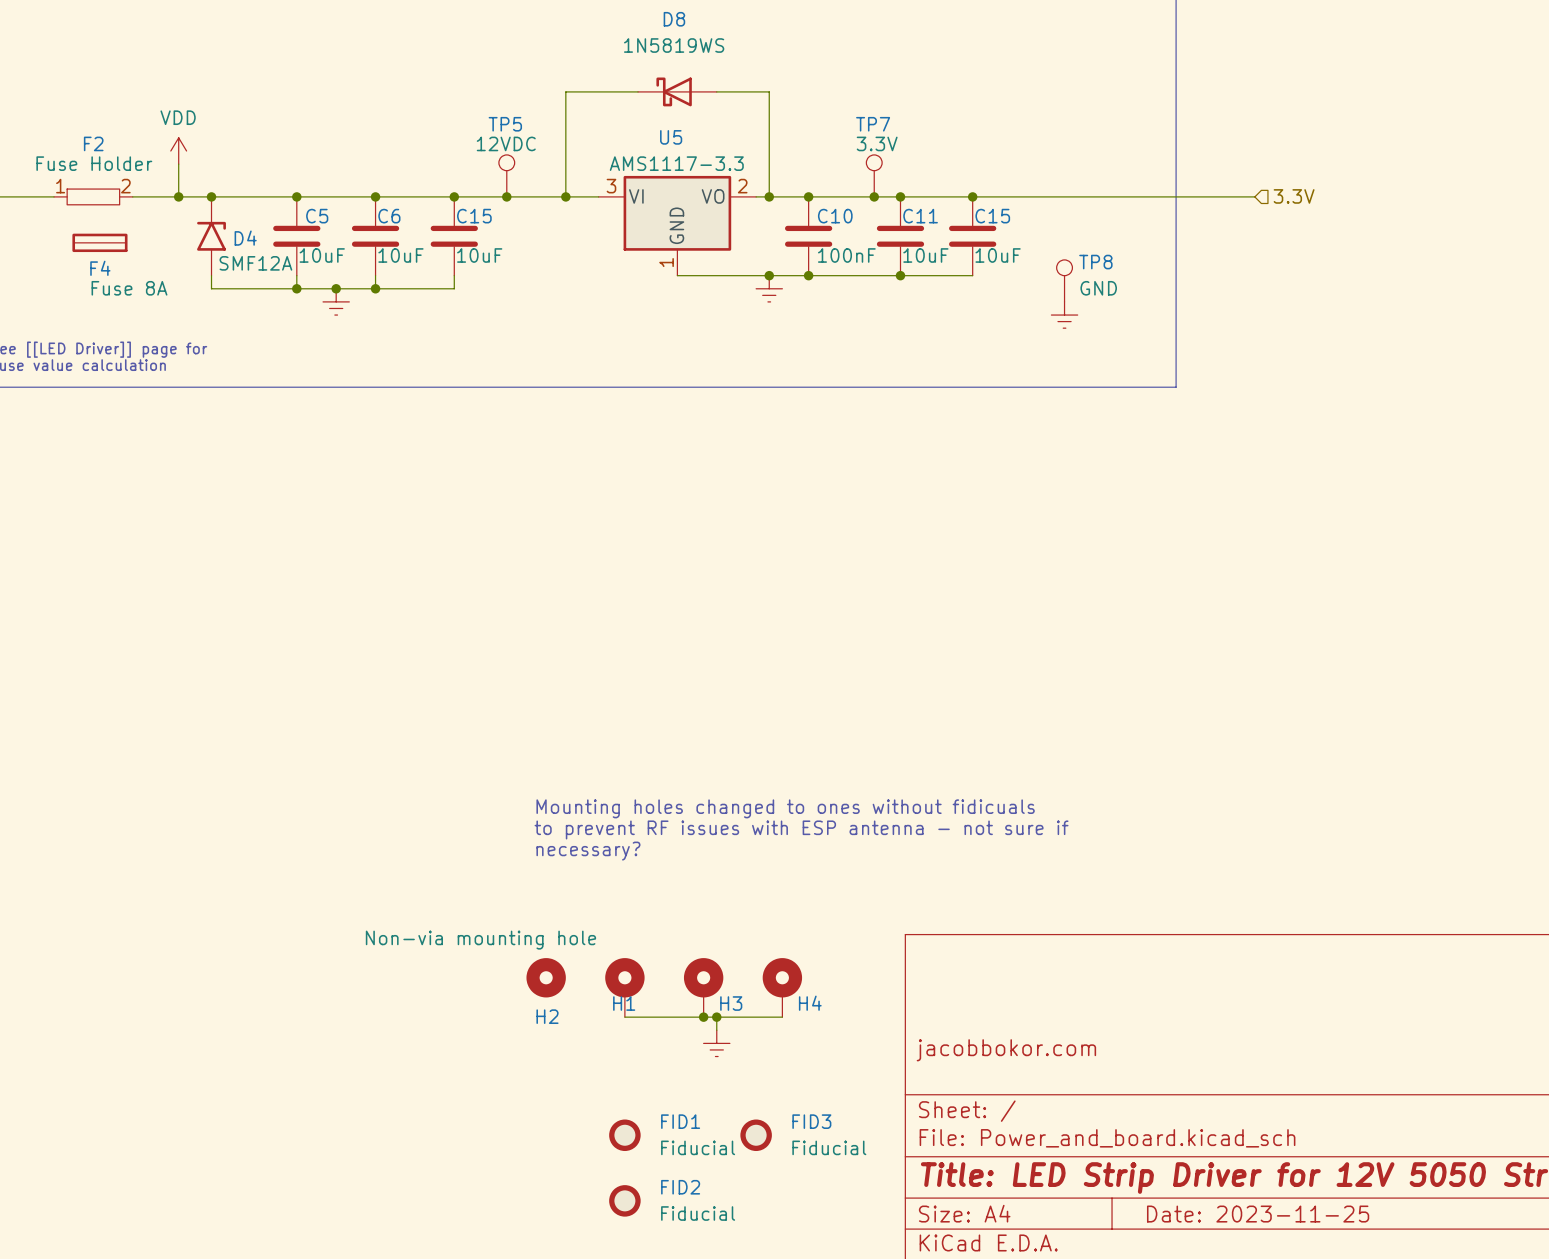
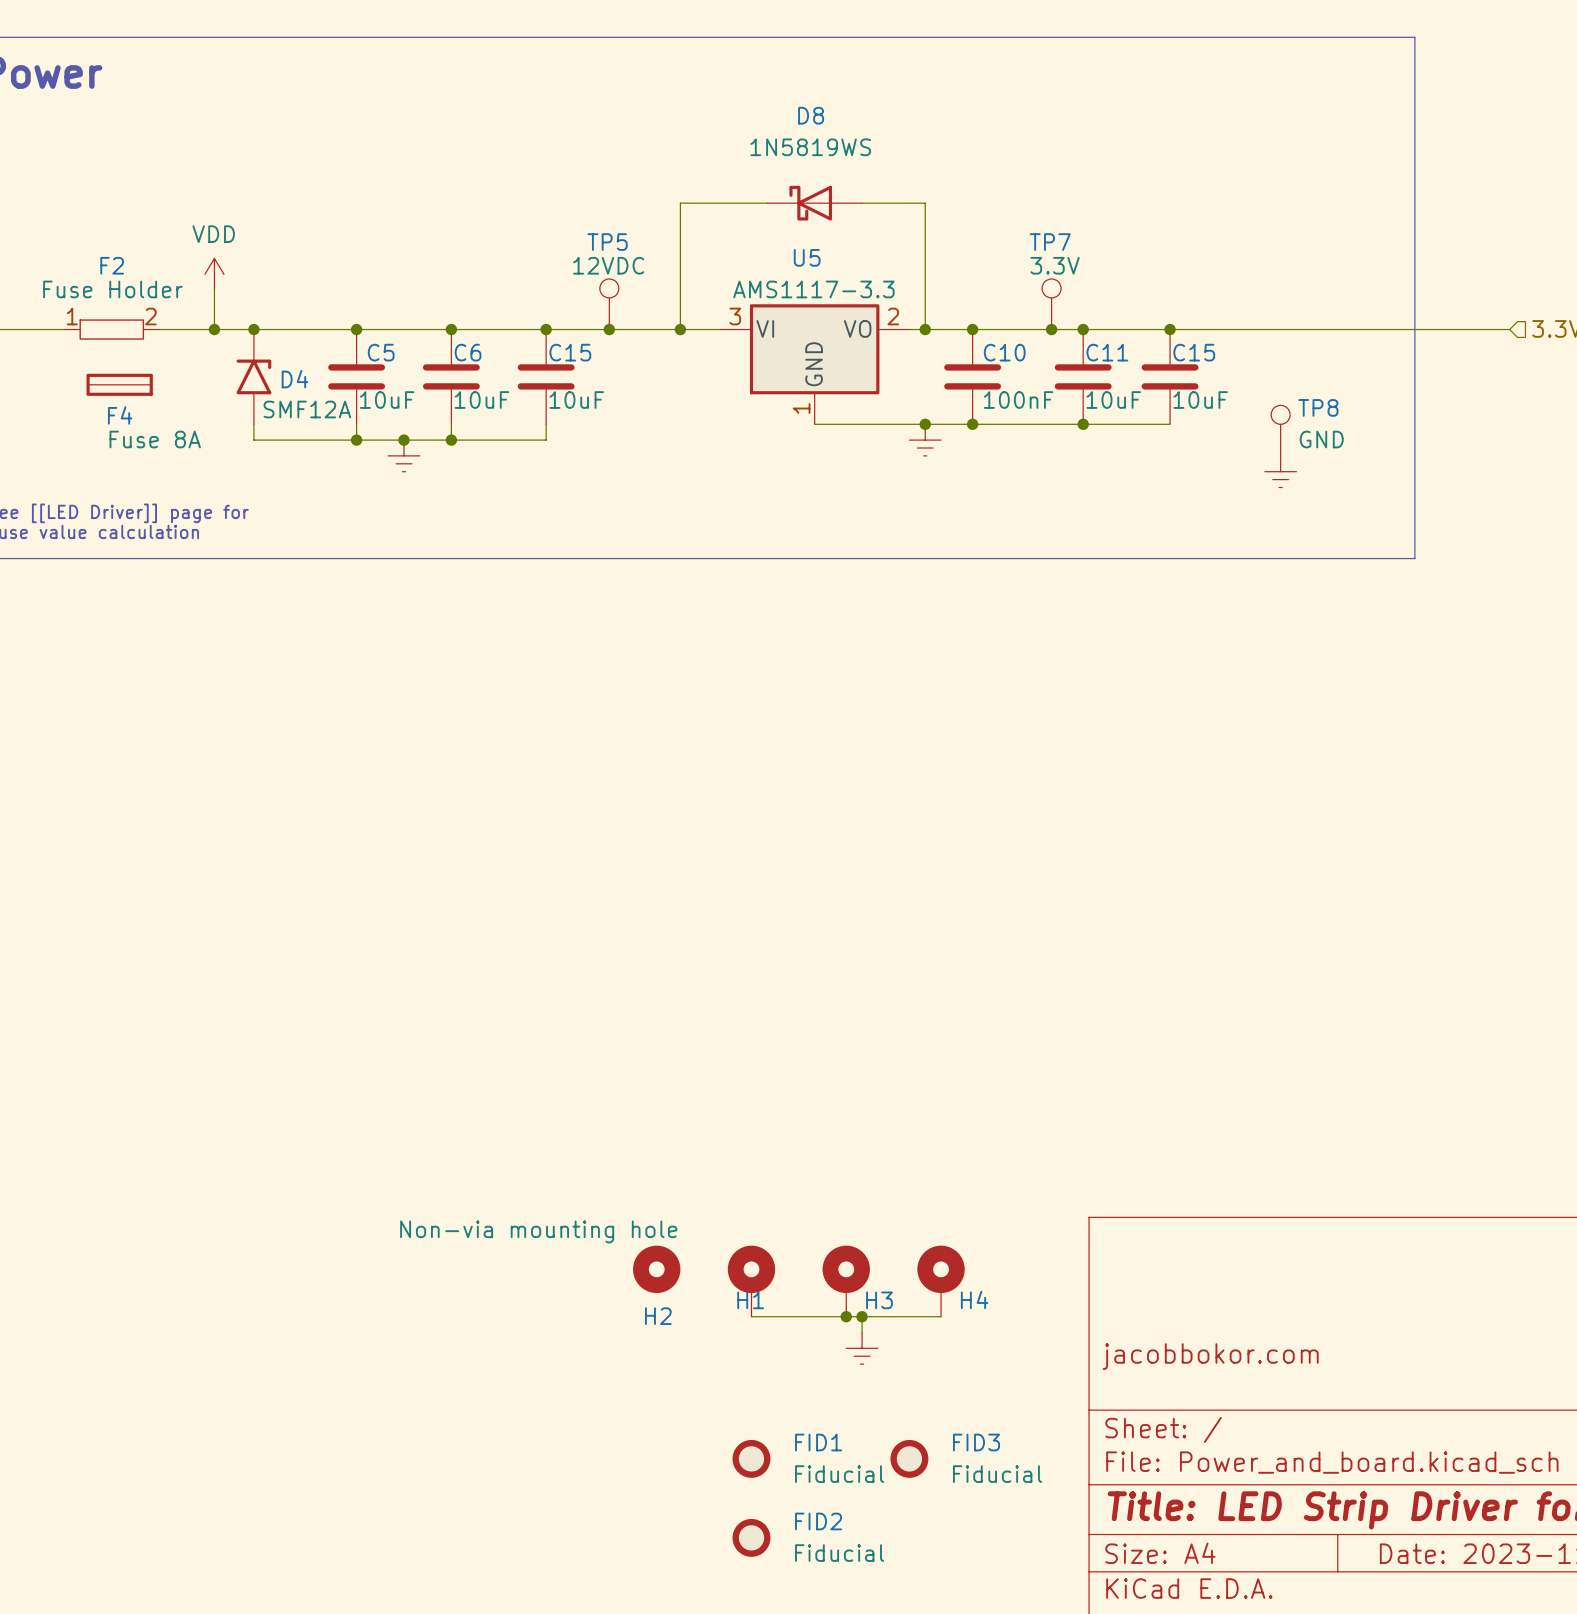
text: Mounting holes changed to ones without fidicuals (785, 808) -> none
text: to prevent RF issues with ESP antenna - not sure if (801, 829) -> none
text: necessary? (588, 851) -> none
H2 value position: Non-via mounting hole (480, 940) -> Non-via mounting hole (538, 1231)

